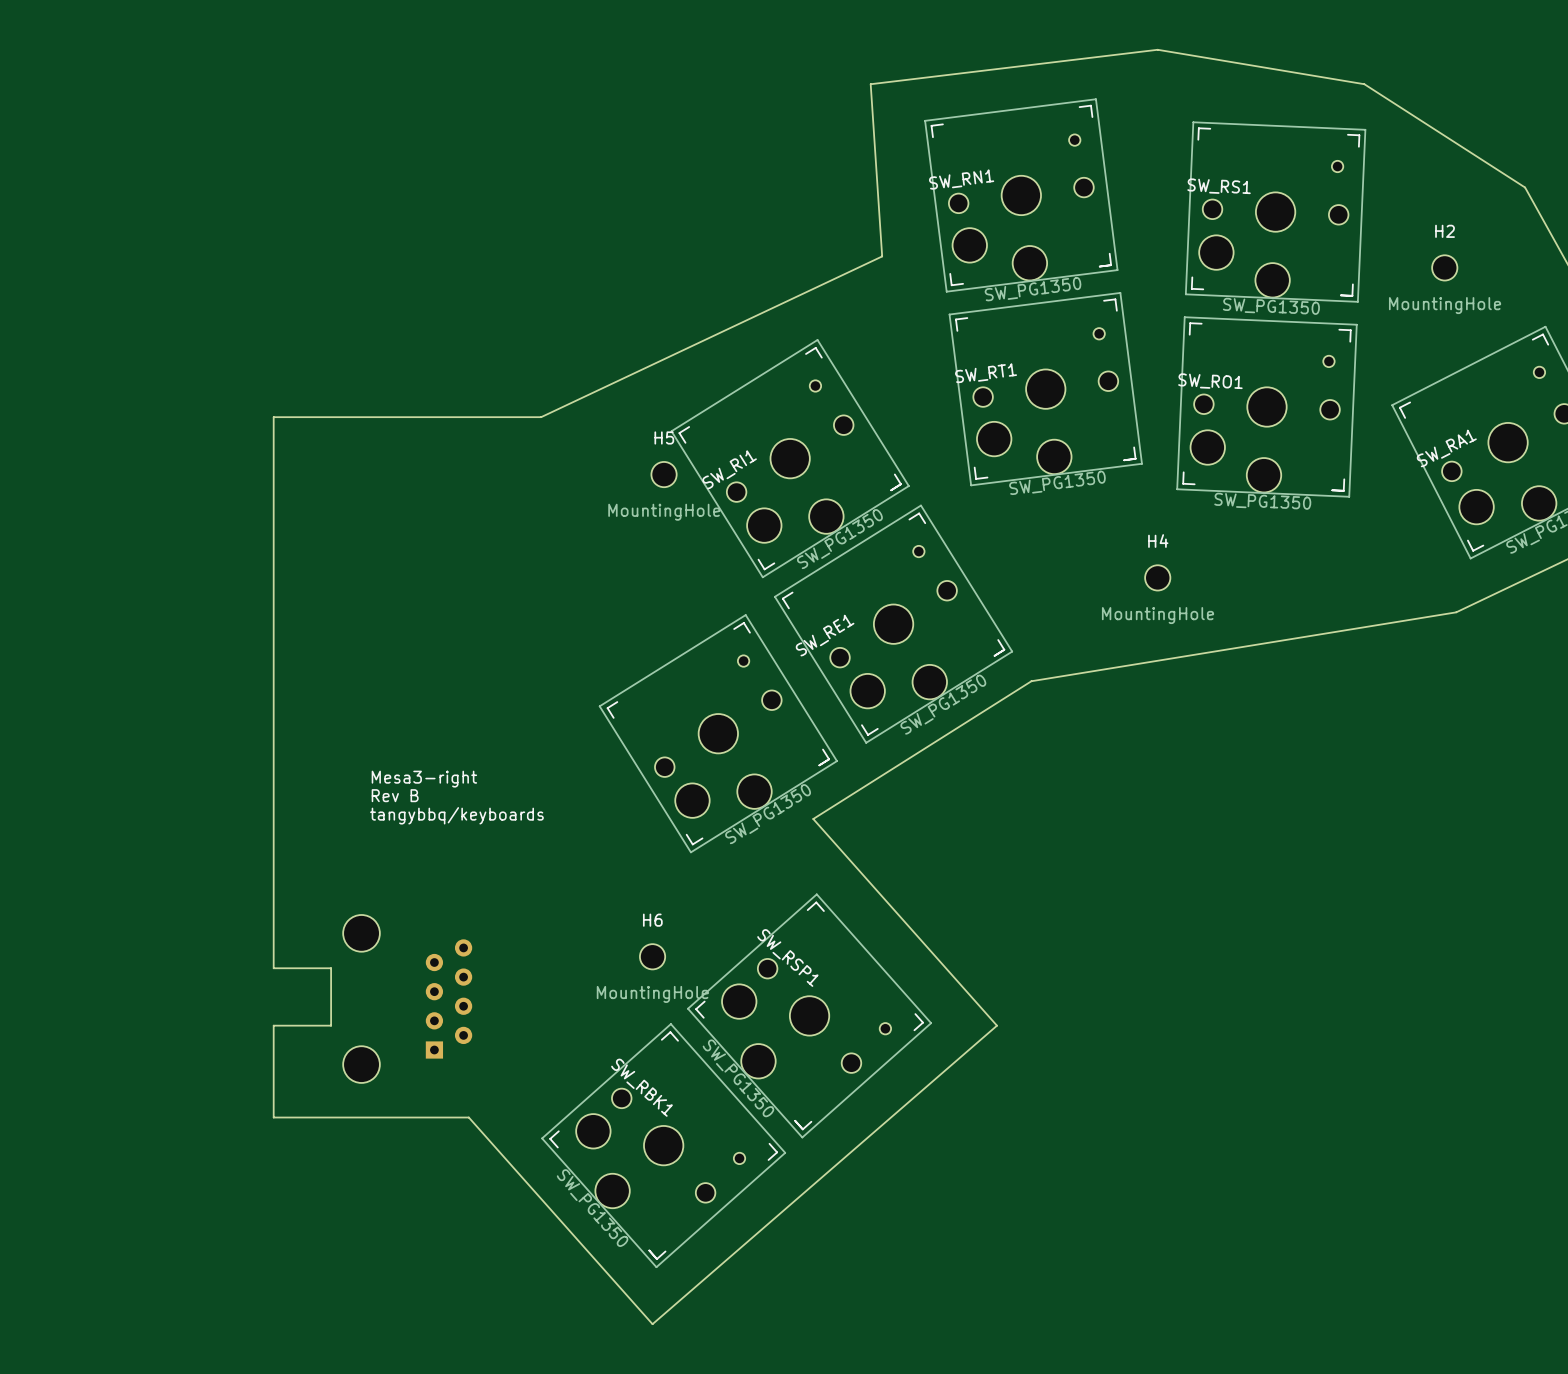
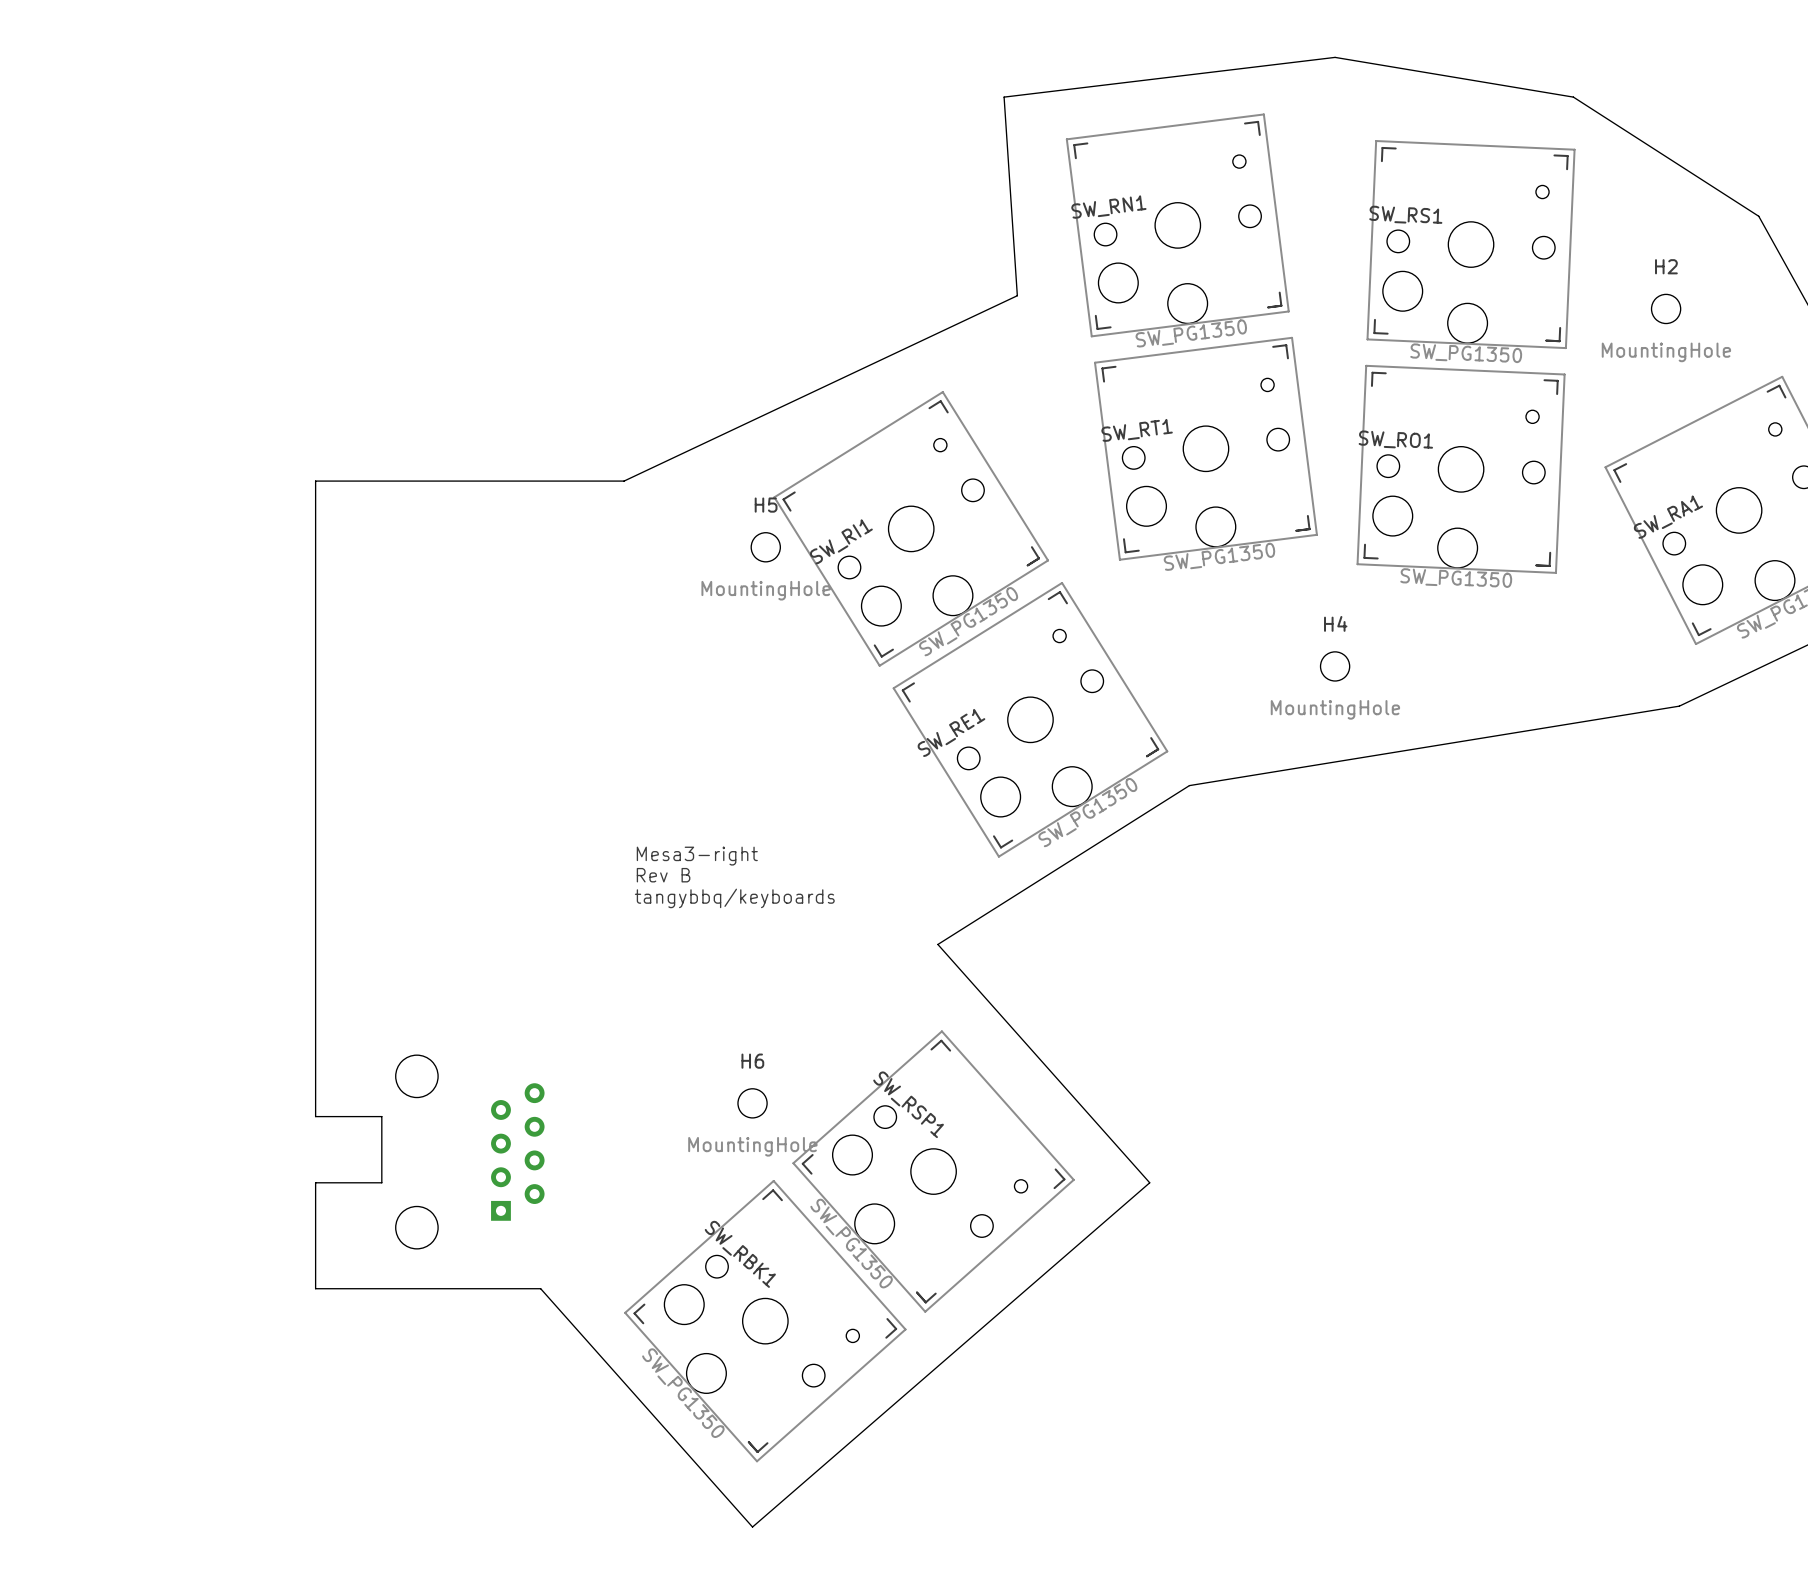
part: SW_PG1350 (718, 733) -> none
text position: Mesa3-right (424, 779) -> Mesa3-right (697, 856)
text position: Rev B (395, 795) -> Rev B (663, 875)
text position: tangybbq/keyboards (456, 815) -> tangybbq/keyboards (734, 898)

